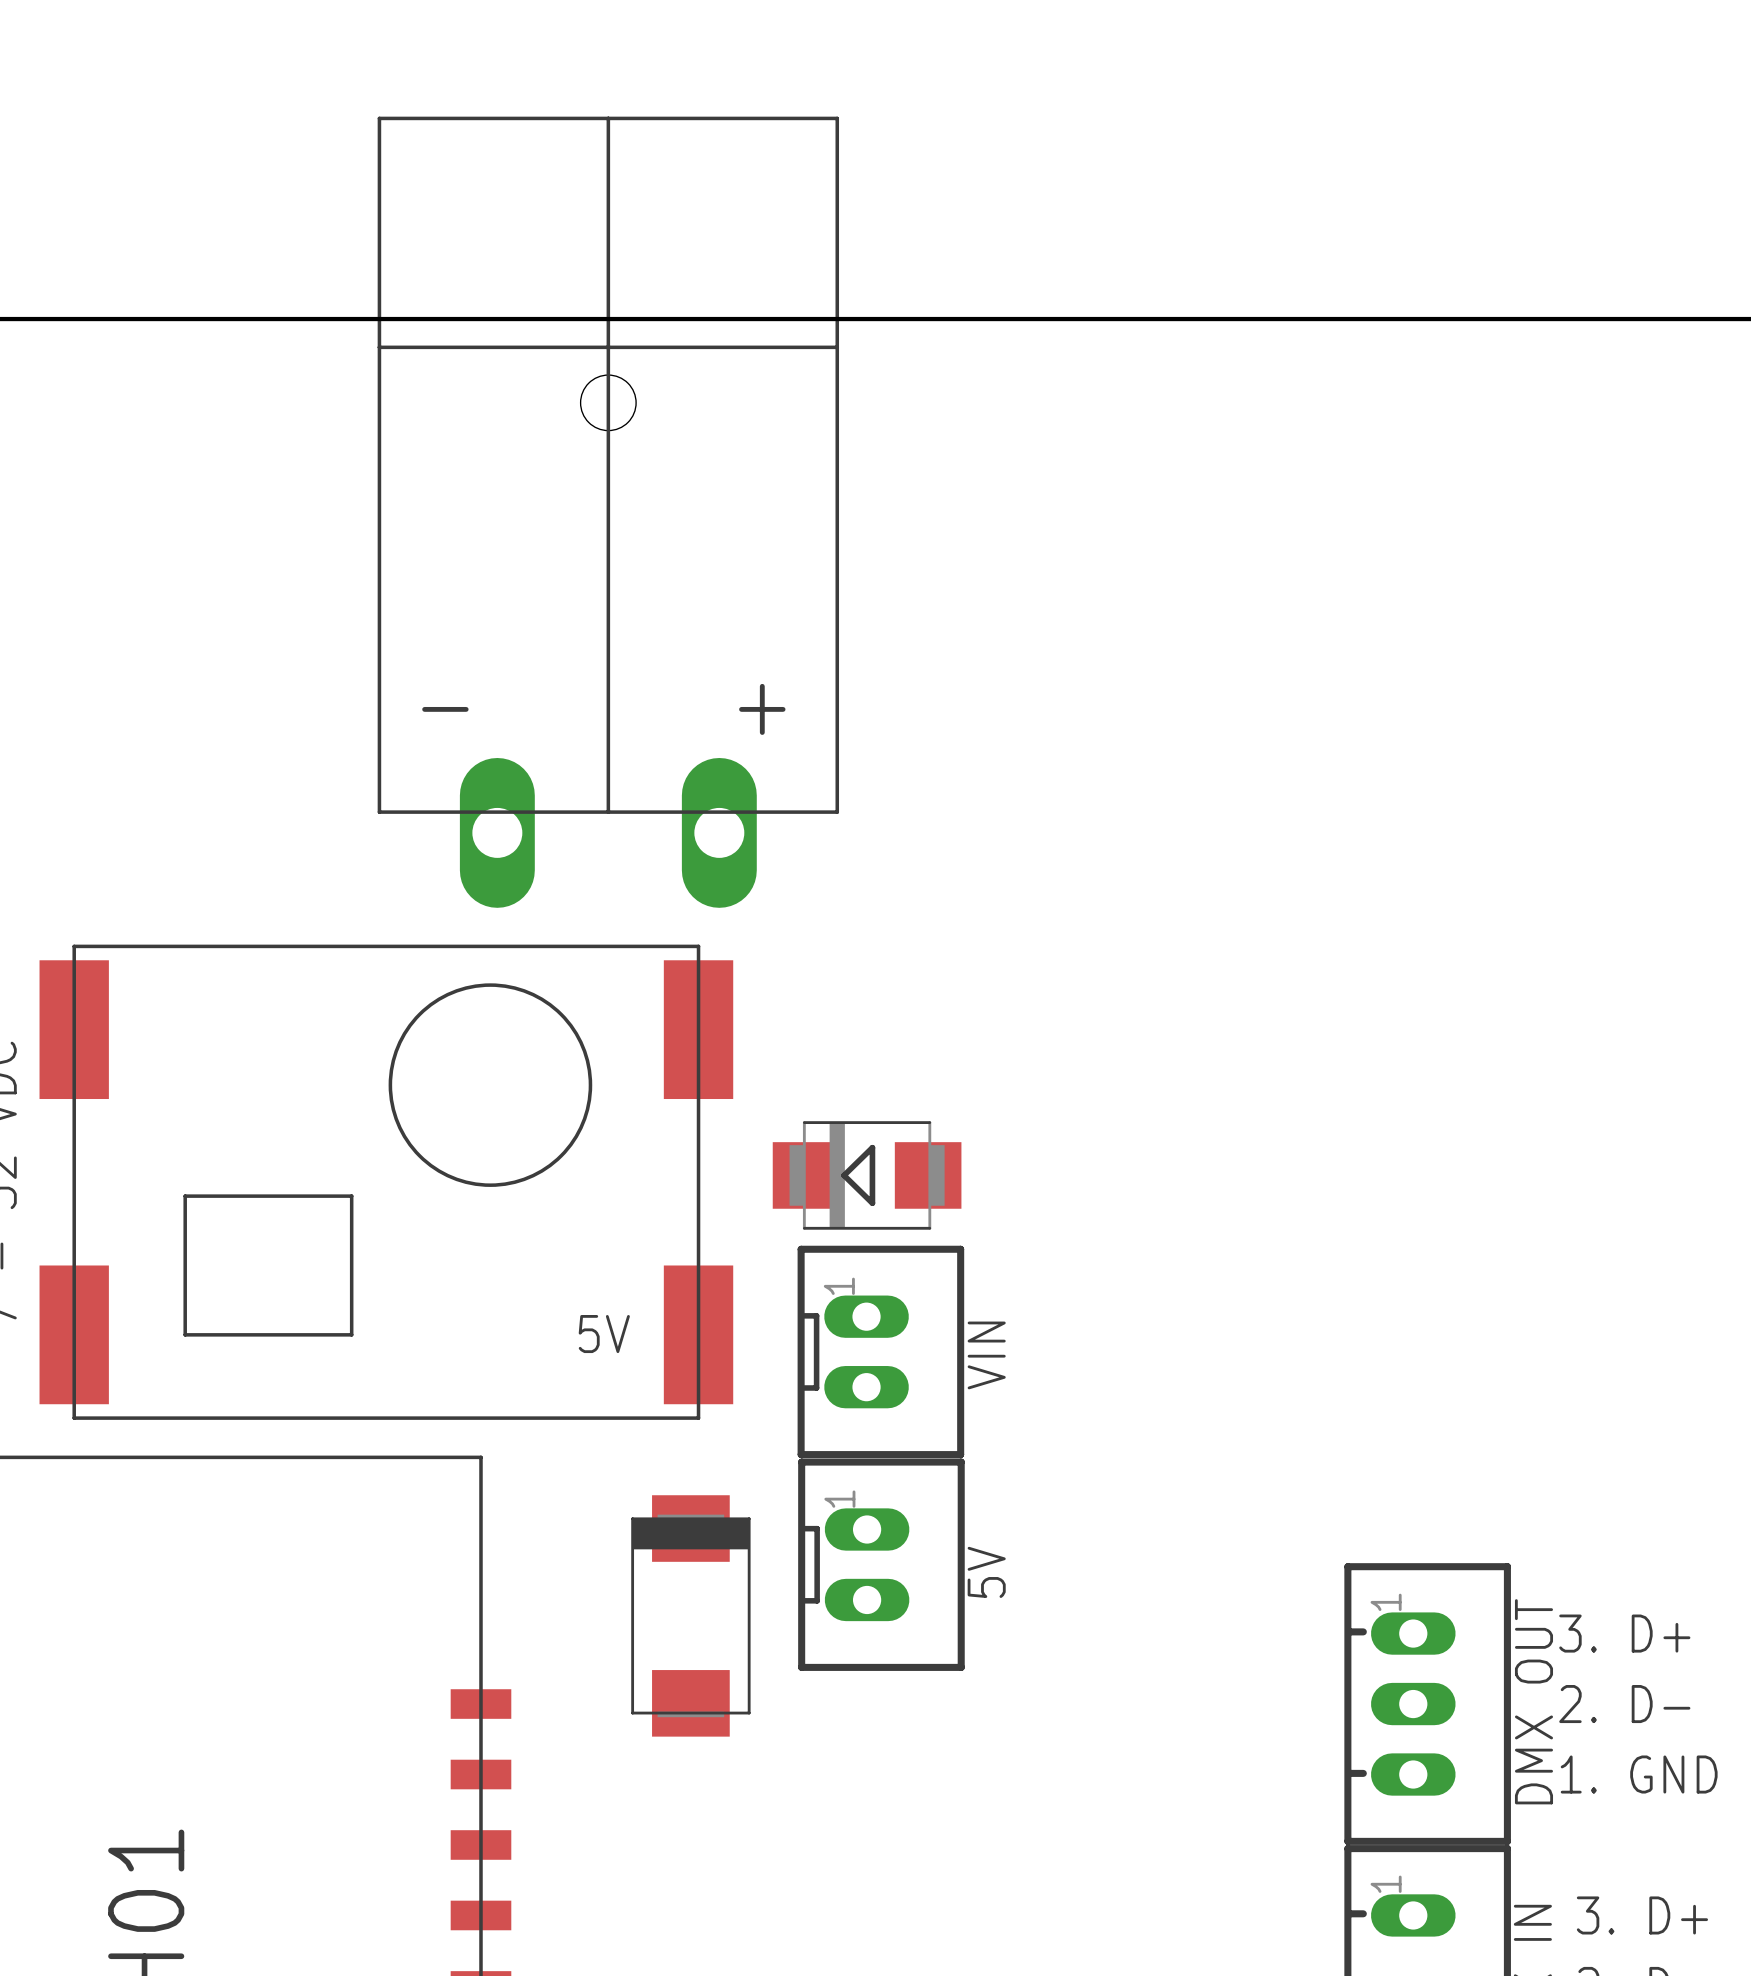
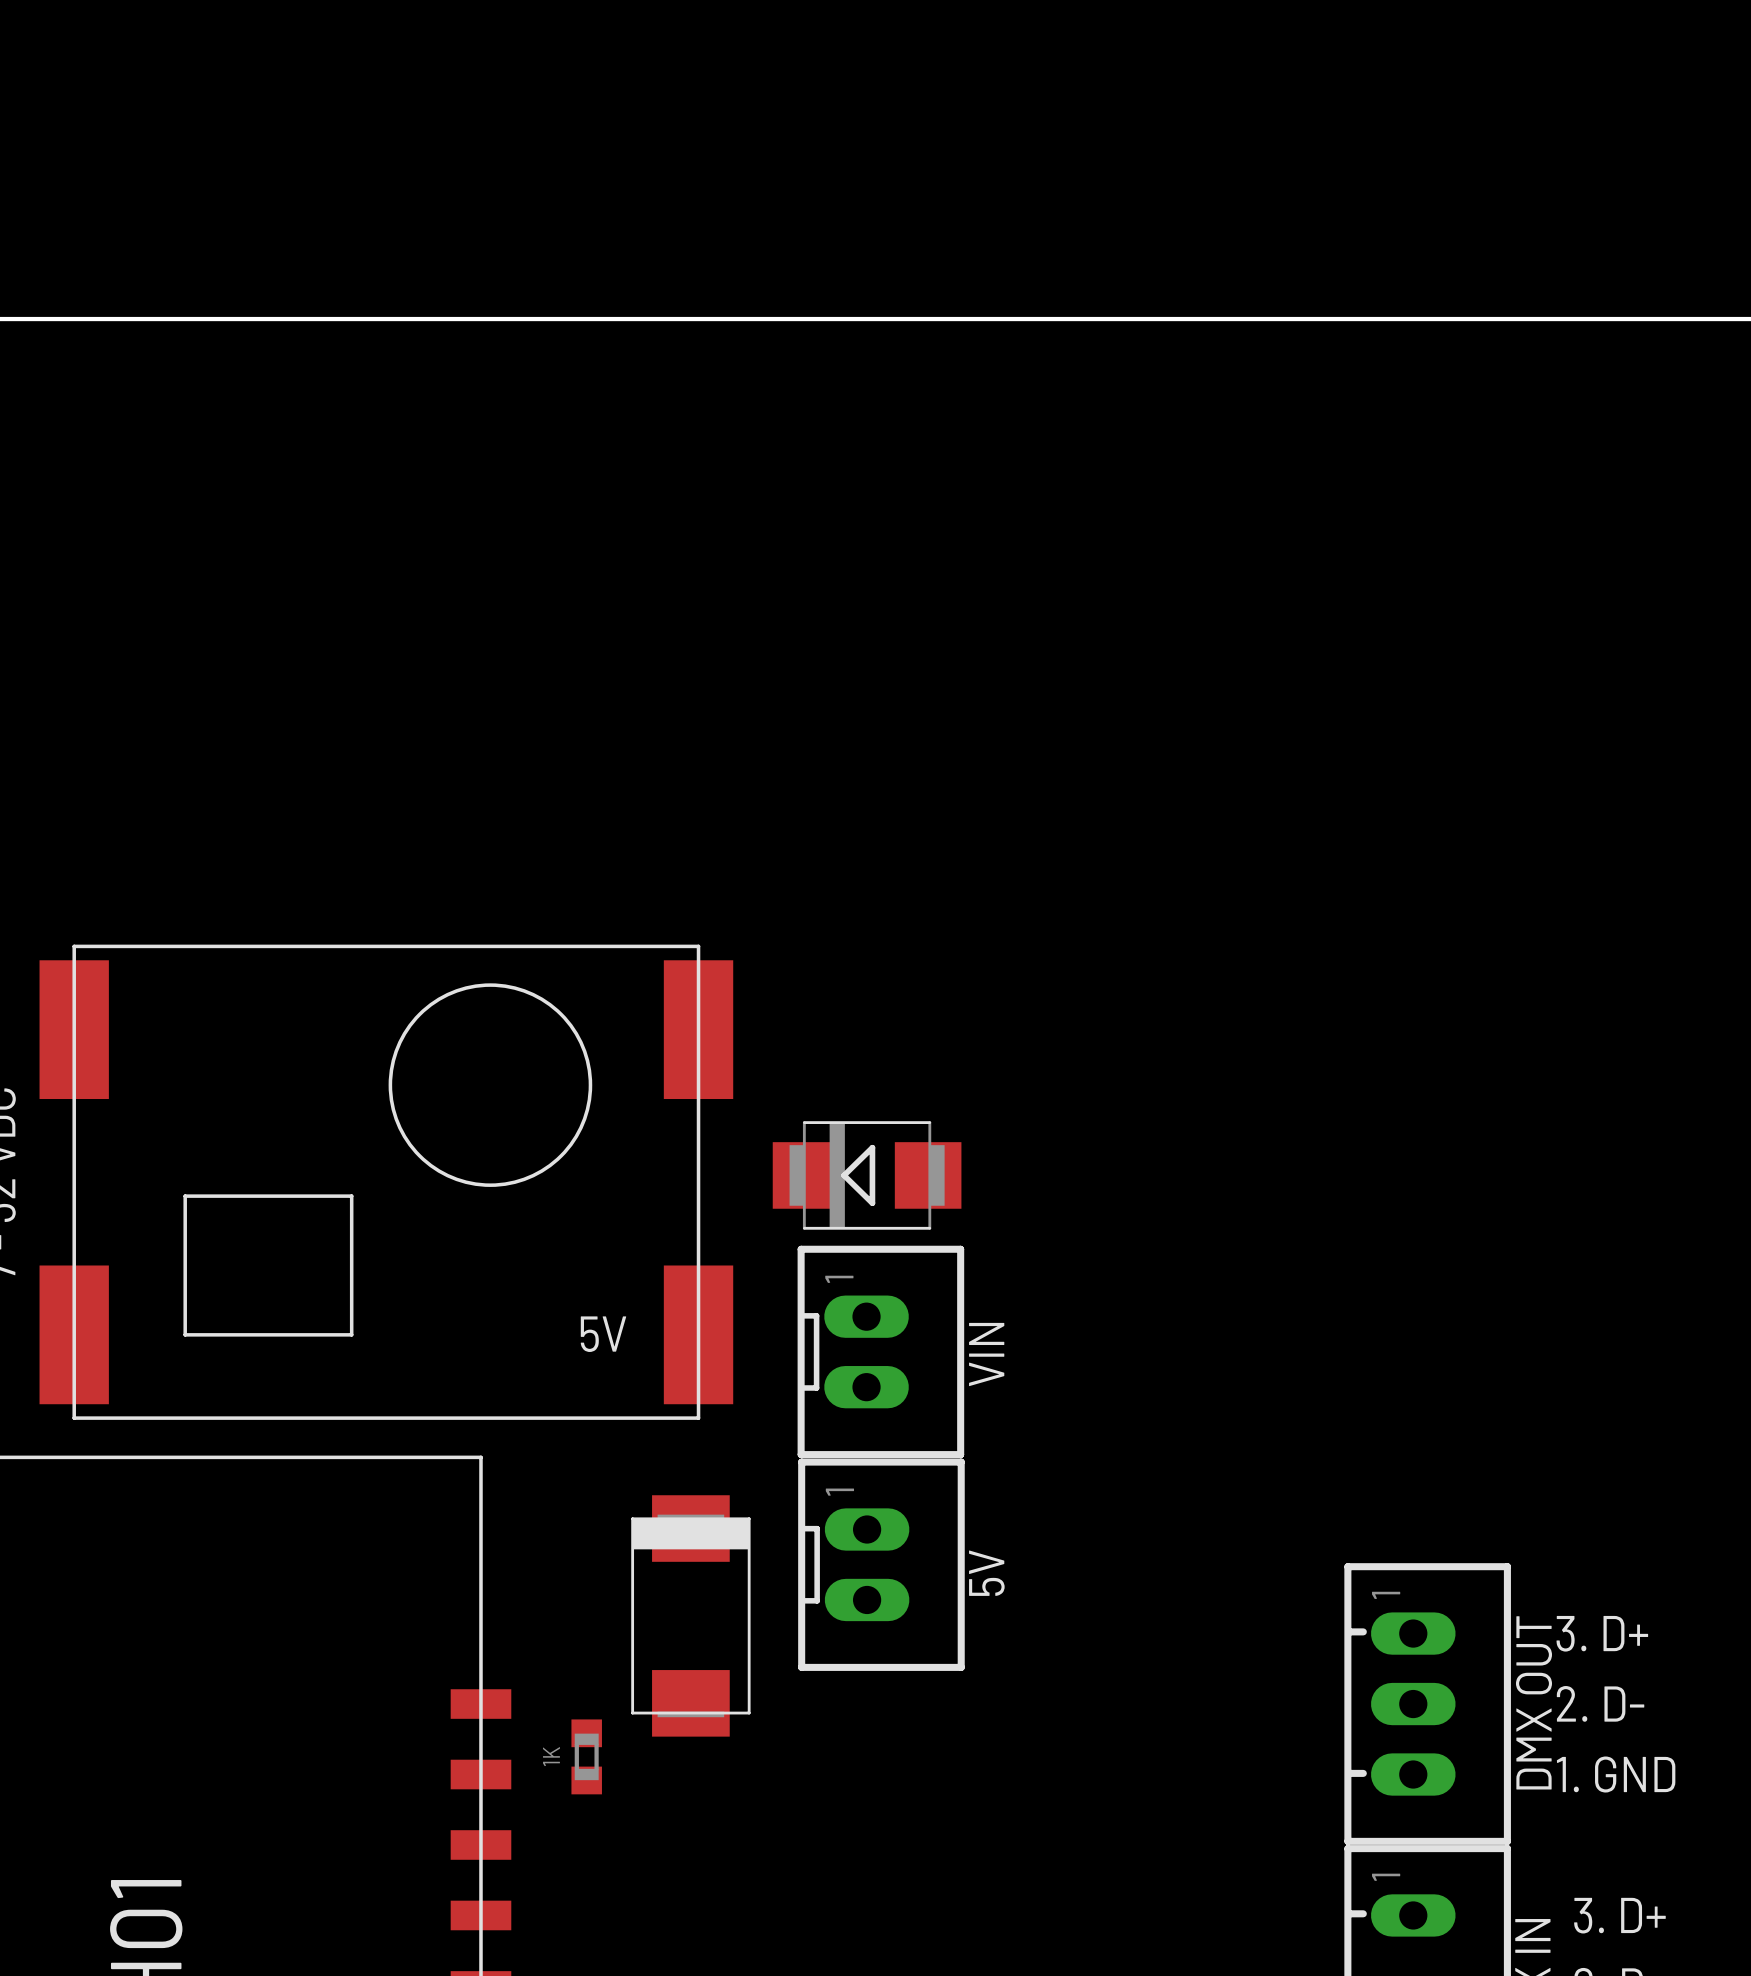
part: (608, 512) -> none
text: - + (603, 709) -> none
part: none -> 1K (586, 1756)

